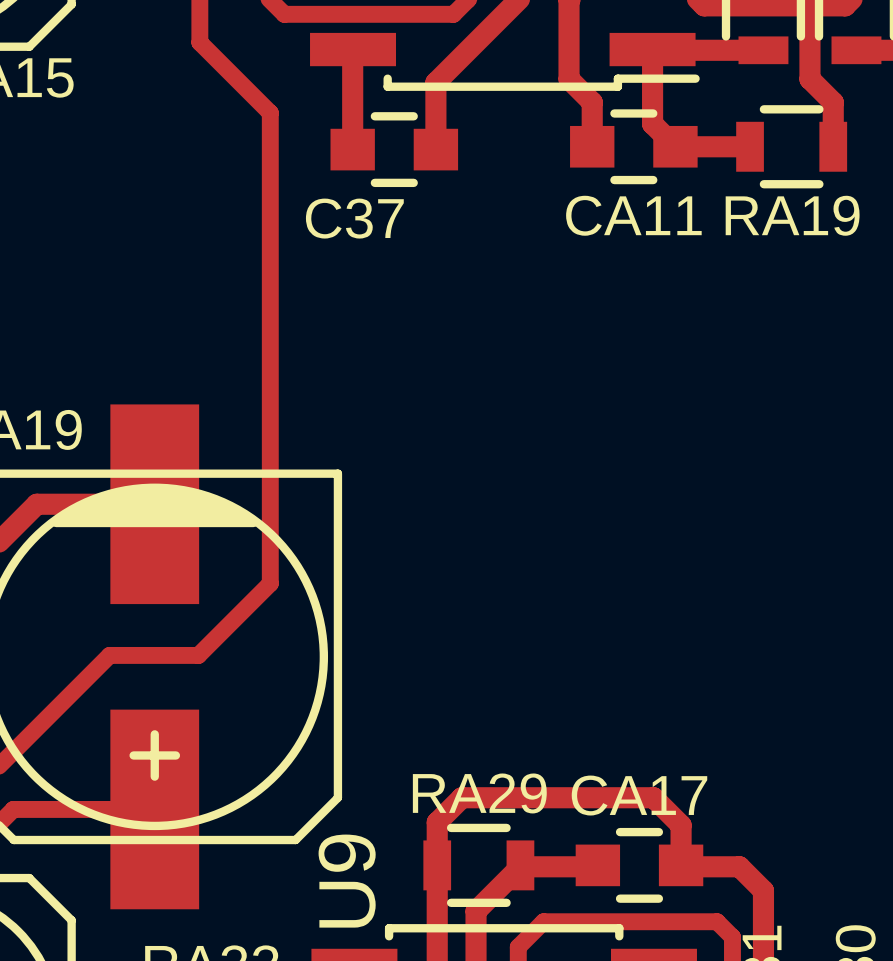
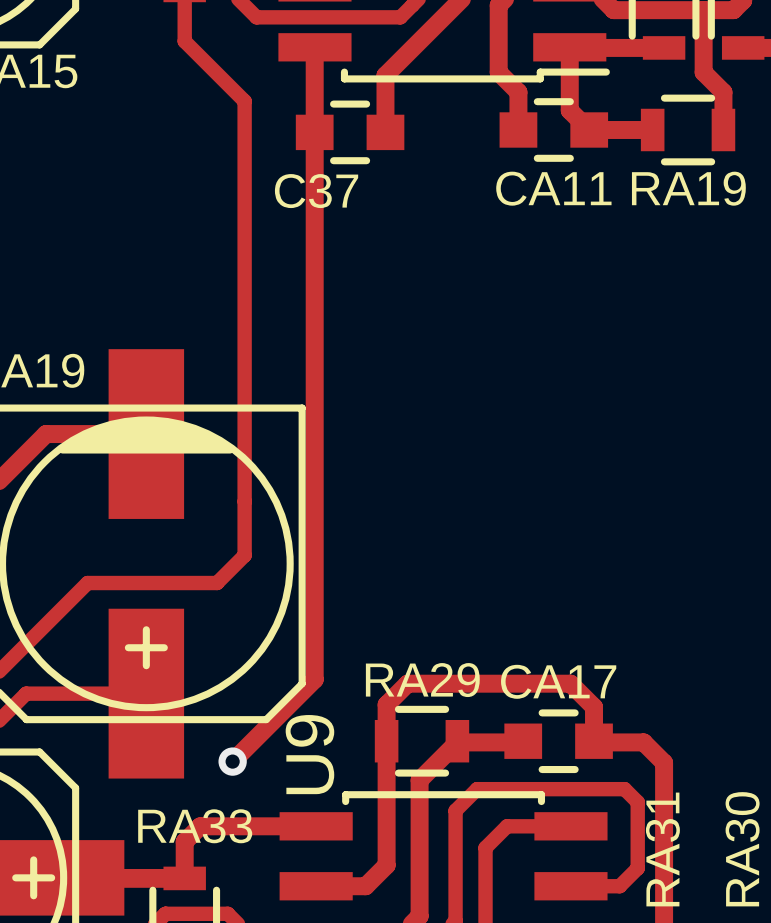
track: none -> (314, 132) (314, 679) (232, 761)
track: (270, 583) (198, 655) (109, 655) (85, 679) -> (244, 501) (244, 555) (217, 583) (87, 583)
via: none -> (232, 761)

